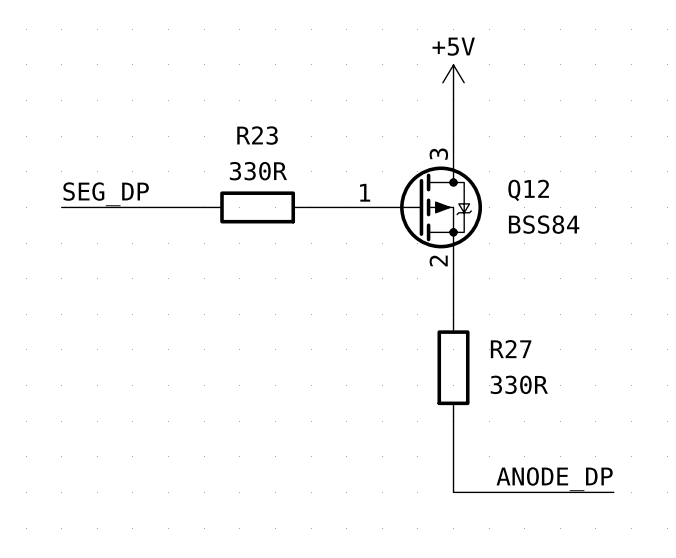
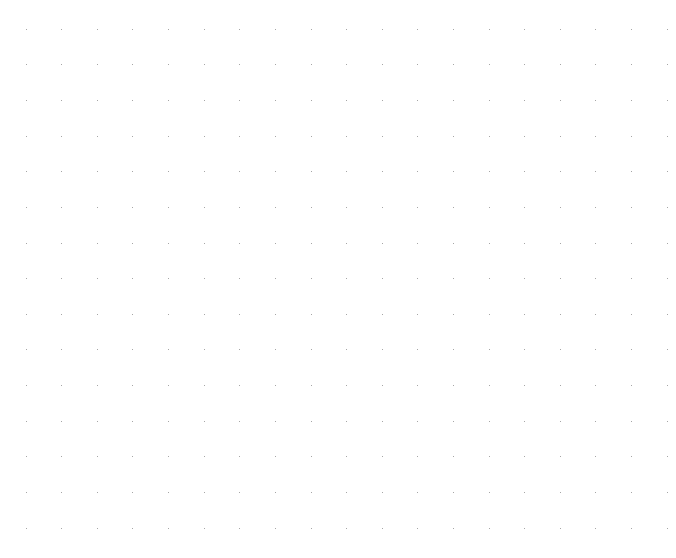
power symbol: +5V (453, 82) -> none
wire: (453, 100) (453, 136) -> none
label: SEG_DP (106, 194) -> none
wire: (61, 207) (204, 207) -> none
R23: 330R (257, 207) -> none
wire: (311, 207) (346, 207) -> none
Q12: BSS84 (414, 207) -> none
wire: (453, 278) (453, 314) -> none
R27: 330R (453, 367) -> none
wire: (453, 421) (453, 492) (613, 492) -> none
label: ANODE_DP (554, 479) -> none

